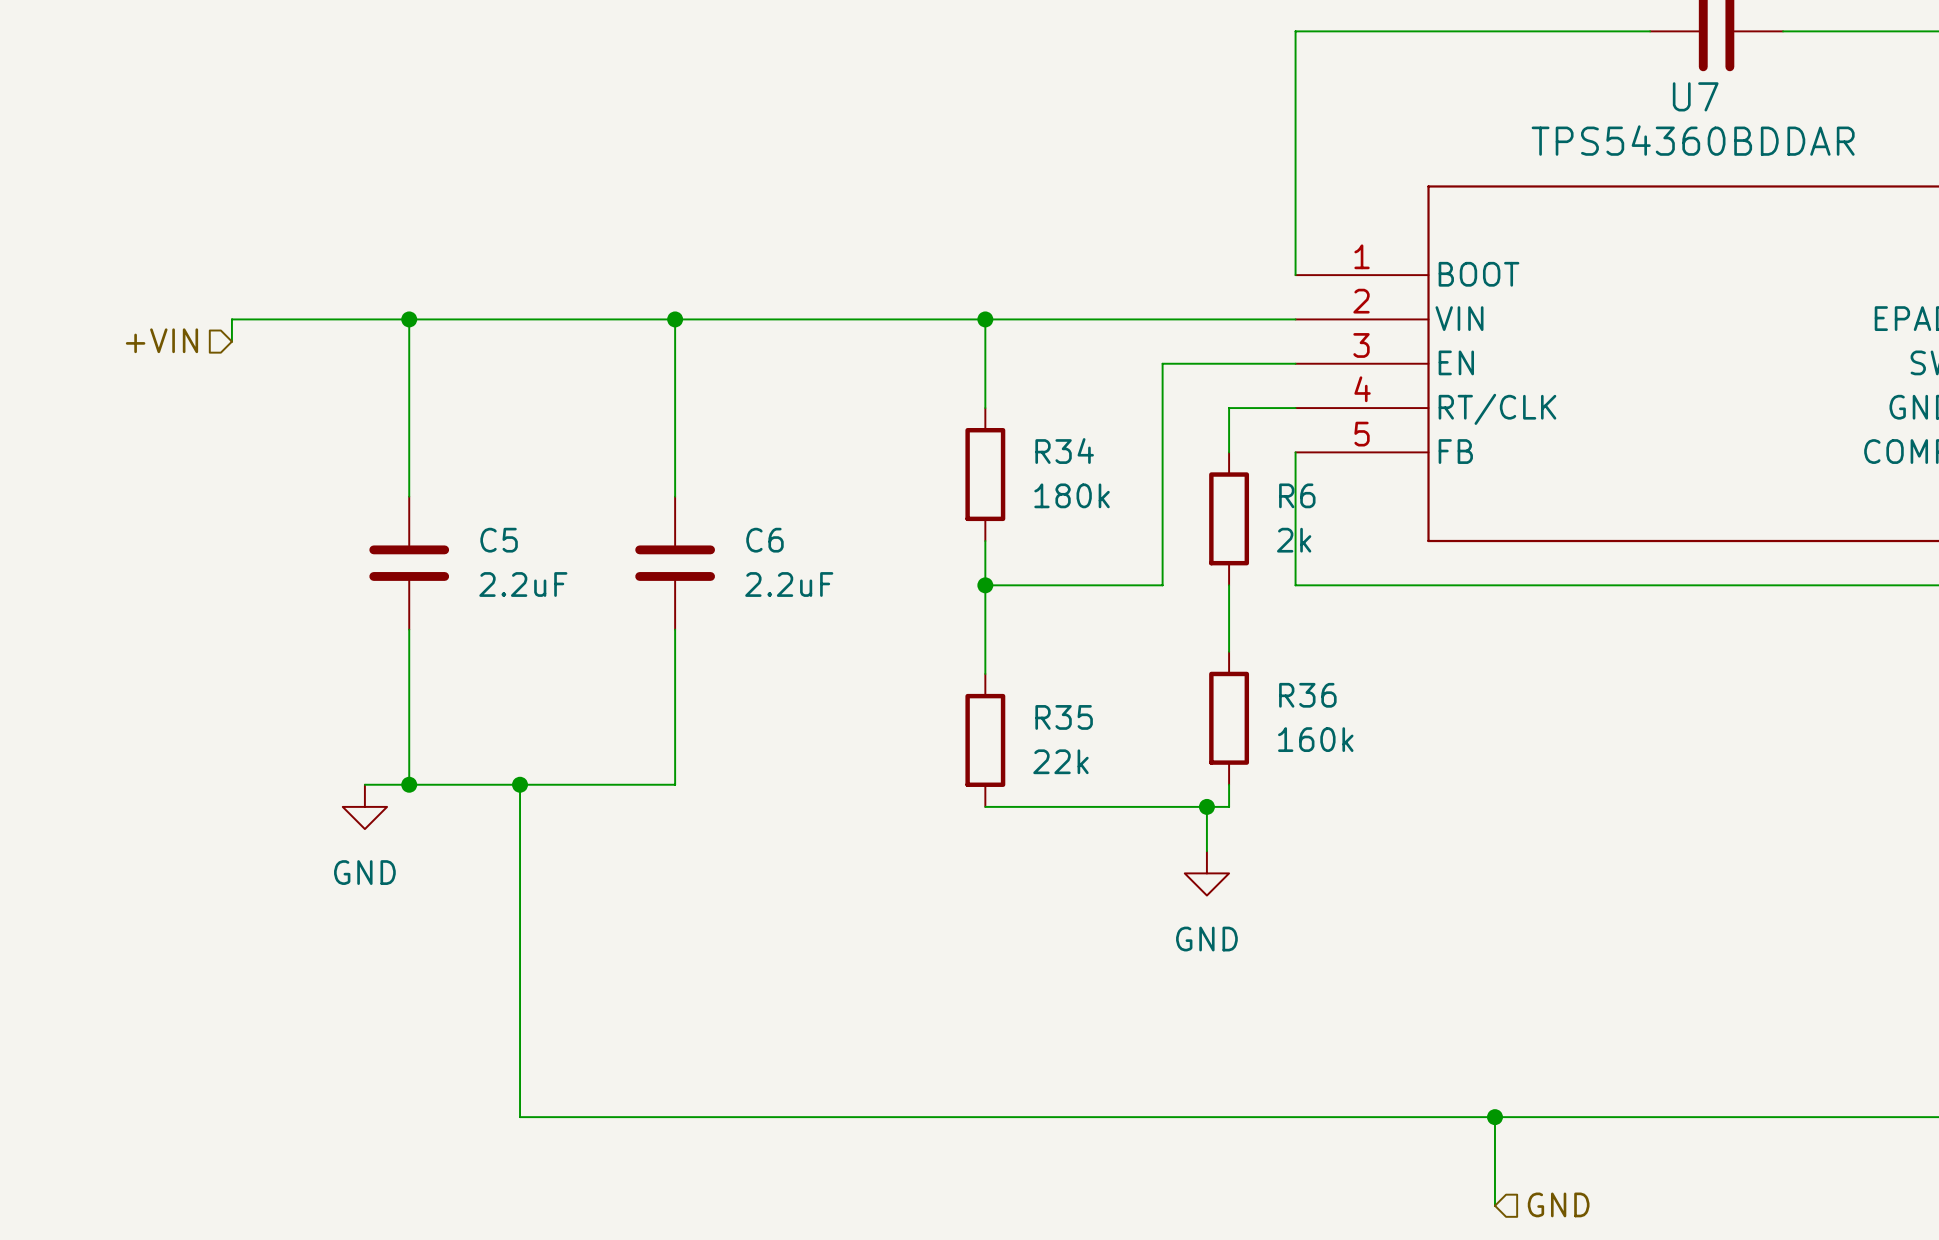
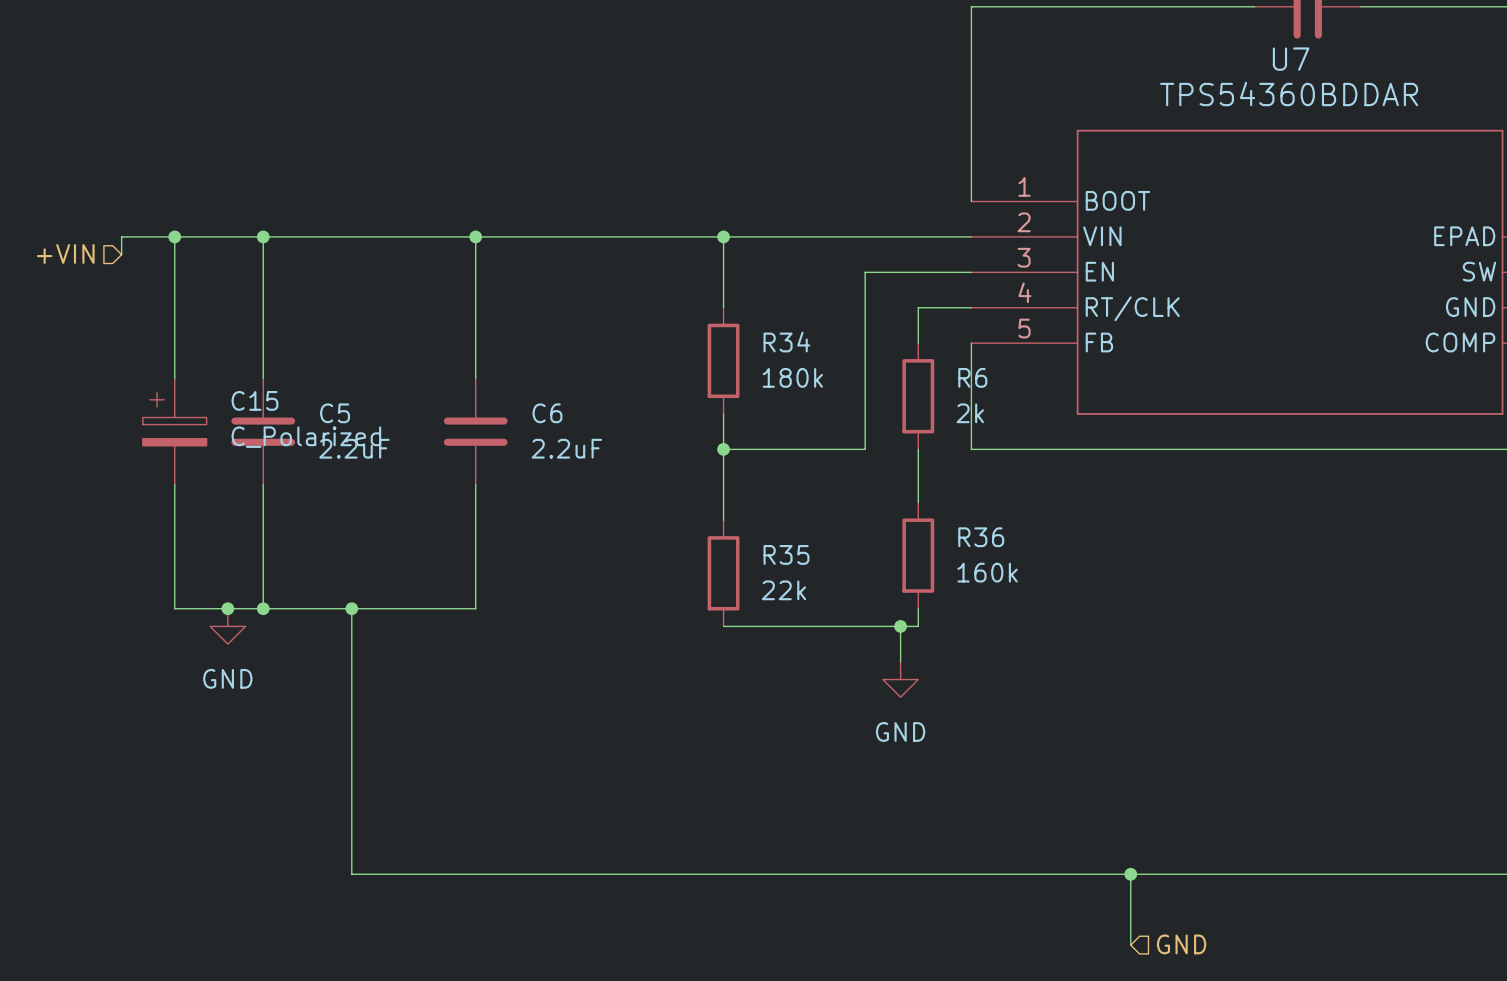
wire: none -> (174, 236) (174, 378)
junction: none -> (174, 236)
C15: none -> C_Polarized (174, 431)
wire: none -> (174, 484) (174, 608) (227, 608)
junction: none -> (227, 608)

